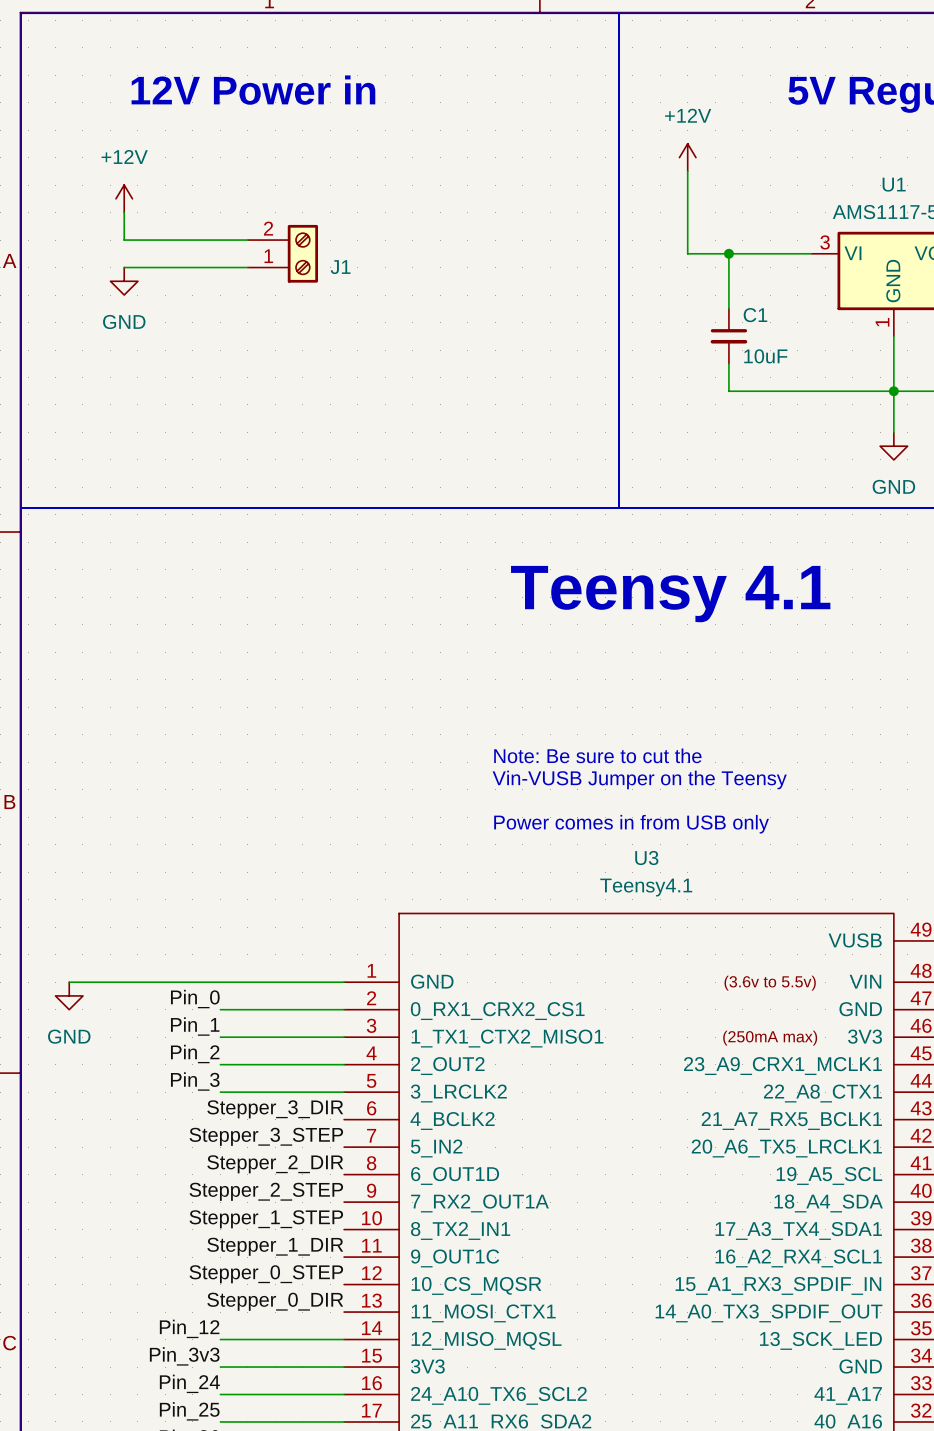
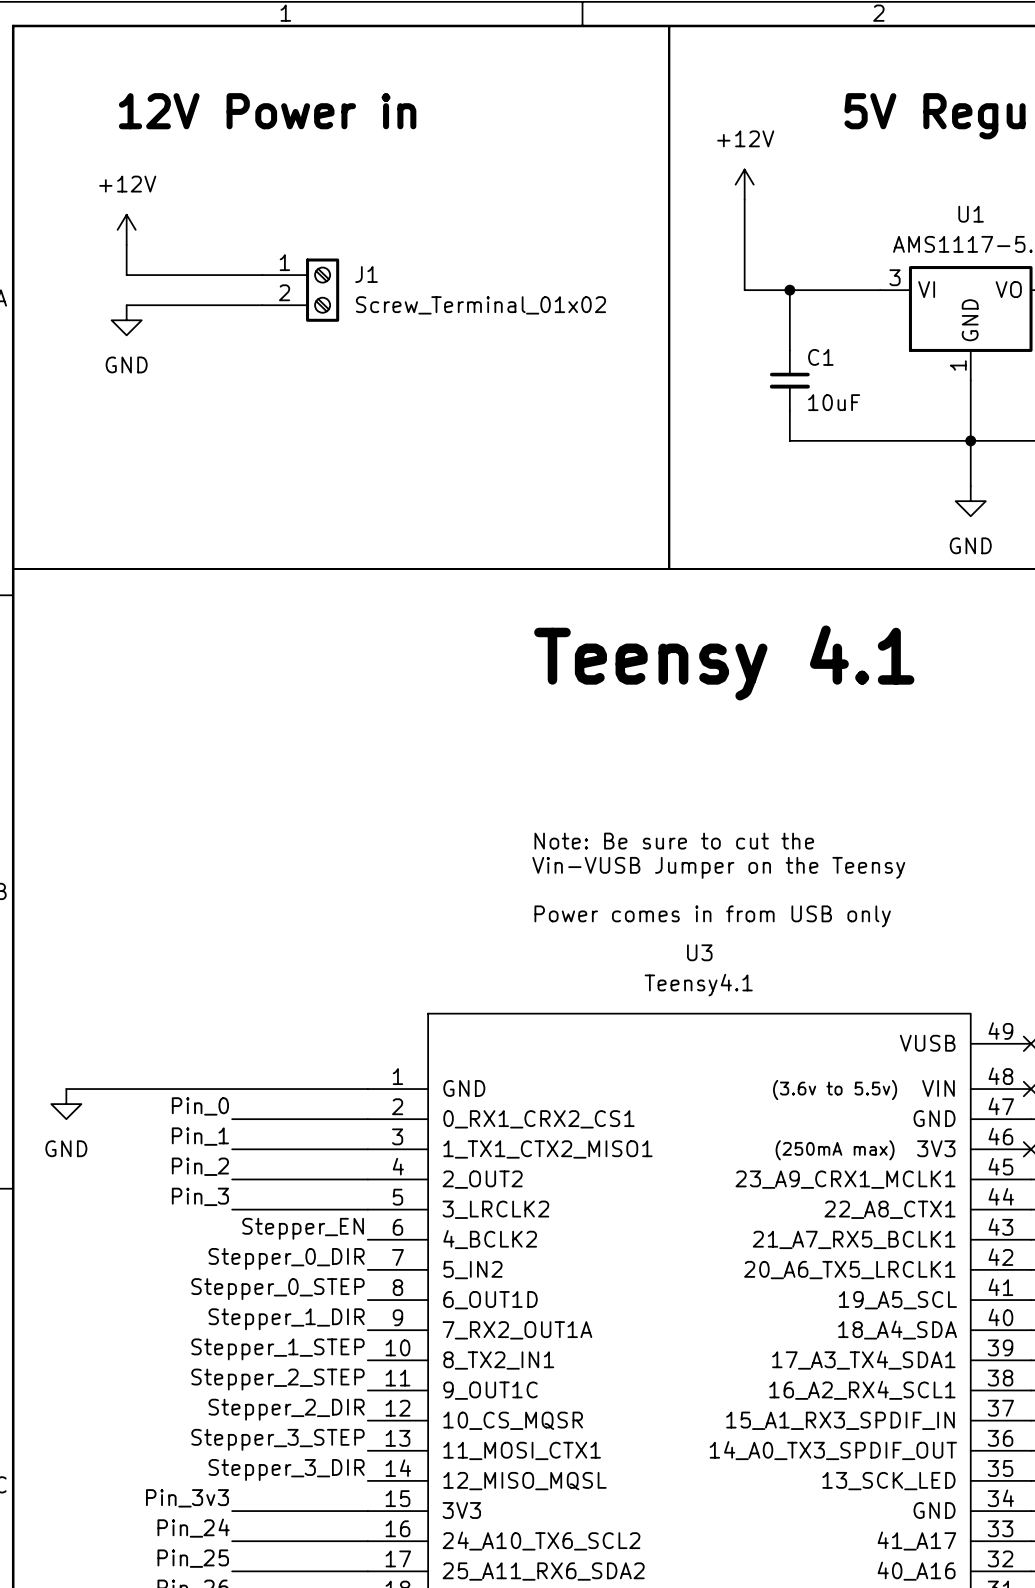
J1 flip: as is (302, 253) -> up-down (322, 290)
J1 value: none -> Screw_Terminal_01x02 (480, 305)
label: Stepper_3_DIR (275, 1109) -> Stepper_EN (303, 1228)
label: Stepper_3_STEP (266, 1136) -> Stepper_0_DIR (286, 1258)
label: Stepper_2_DIR (275, 1164) -> Stepper_0_STEP (277, 1289)
label: Stepper_2_STEP (266, 1191) -> Stepper_1_DIR (286, 1319)
label: Stepper_1_DIR (275, 1246) -> Stepper_2_STEP (277, 1379)
label: Stepper_0_STEP (266, 1274) -> Stepper_2_DIR (286, 1409)
label: Stepper_0_DIR (275, 1301) -> Stepper_3_STEP (277, 1439)
label: Pin_12 (189, 1328) -> none
label: none -> Stepper_3_DIR (286, 1469)
wire: (220, 1339) (344, 1339) -> none

